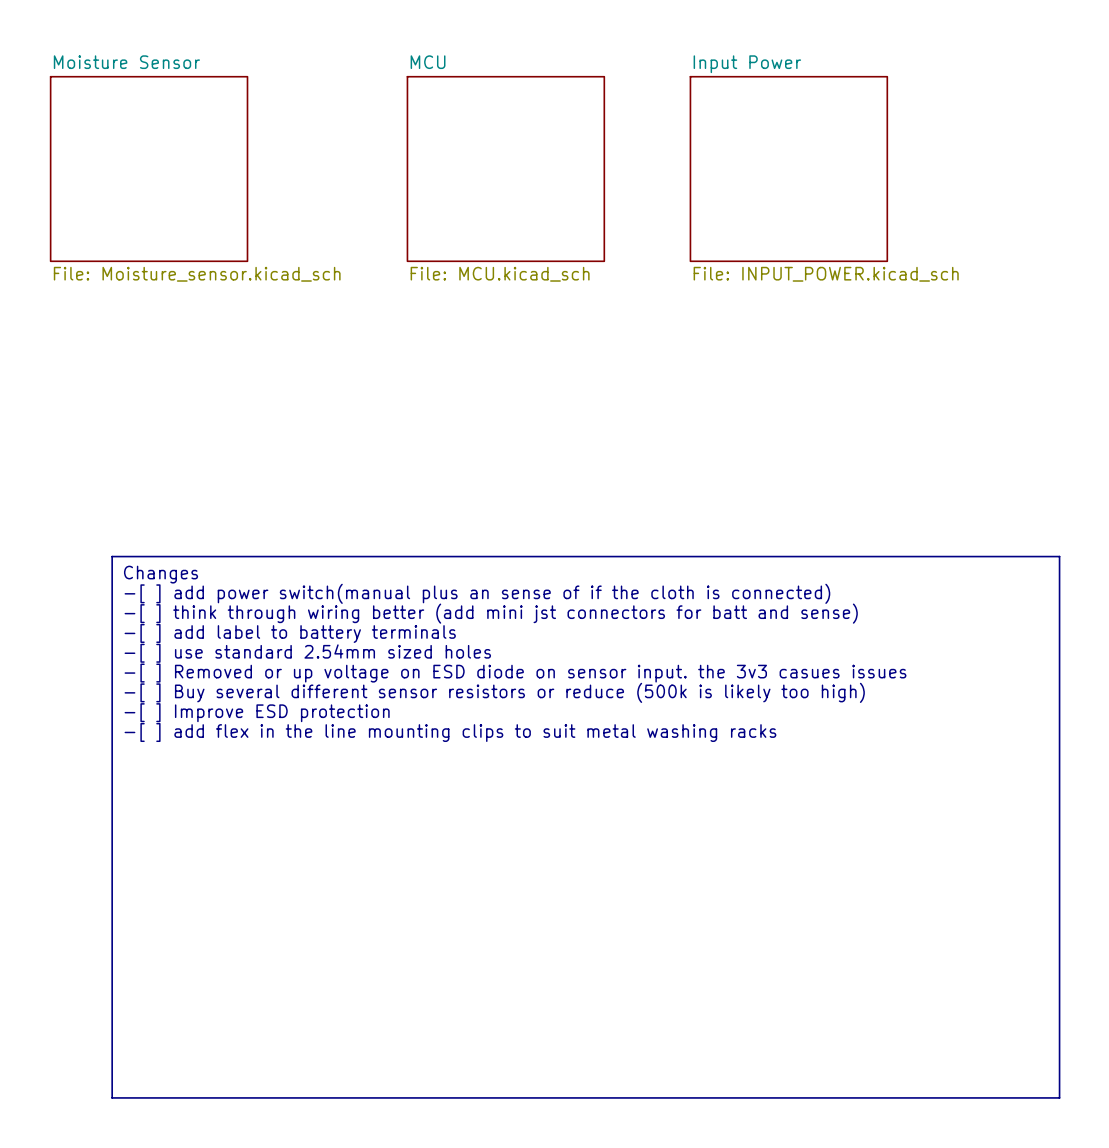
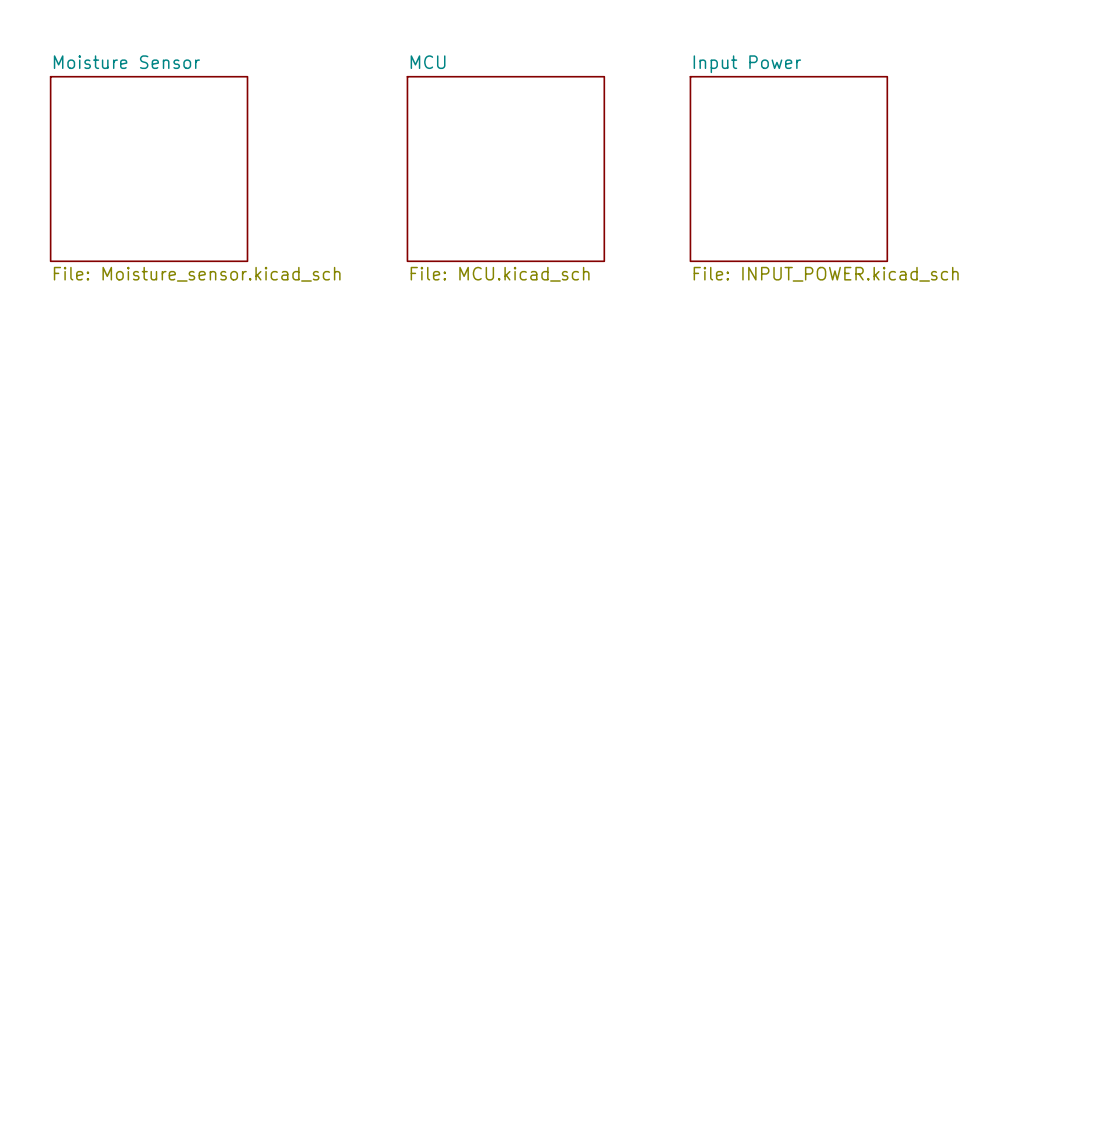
line: (112, 556) (1059, 556) (1059, 1097) (112, 1097) (112, 556) -> none
text: Changes (161, 574) -> none
text: -[ ] add power switch(manual plus an sense of if the cloth is connected) (477, 593) -> none
text: -[ ] think through wiring better (add mini jst connectors for batt and sense) (491, 613) -> none
text: -[ ] add label to battery terminals (290, 633) -> none
text: -[ ] use standard 2.54mm sized holes (307, 653) -> none
text: -[ ] Removed or up voltage on ESD diode on sensor input. the 3v3 casues issues (515, 673) -> none
text: -[ ] Buy several different sensor resistors or reduce (500k is likely too high) (494, 692) -> none
text: -[ ] Improve ESD protection (257, 712) -> none
text: -[ ] add flex in the line mounting clips to suit metal washing racks (450, 732) -> none

